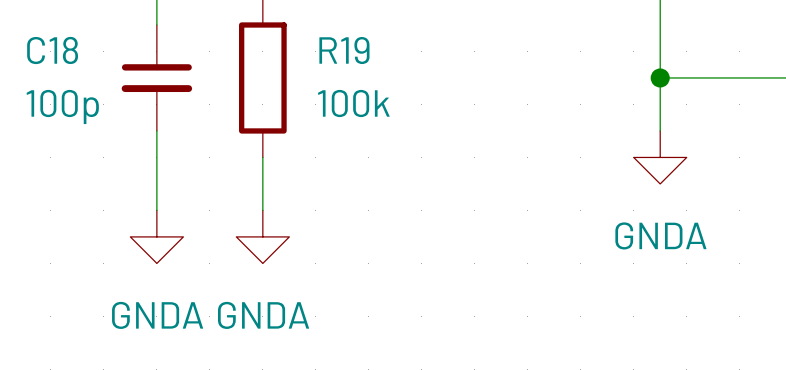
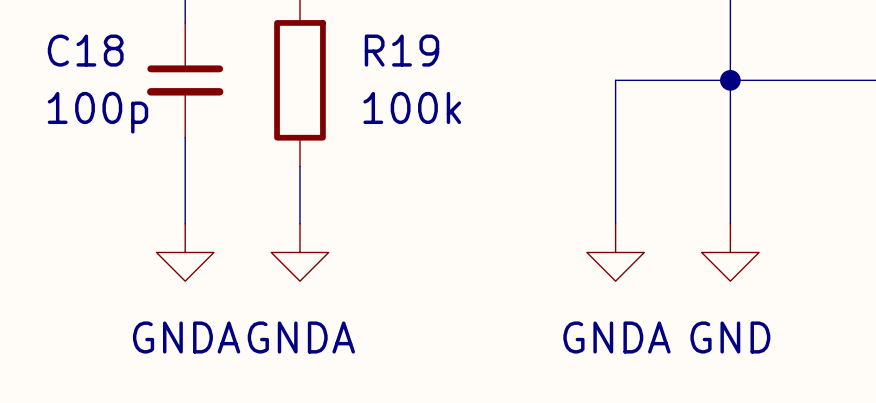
wire: none -> (730, 80) (615, 80) (615, 223)
wire: none -> (730, 137) (730, 223)
power symbol position: GNDA (660, 157) -> GNDA (615, 252)
power symbol: none -> GND (730, 252)

